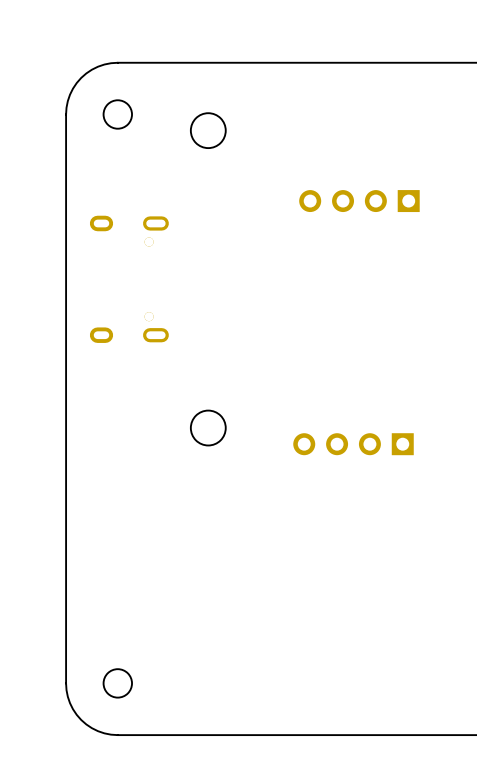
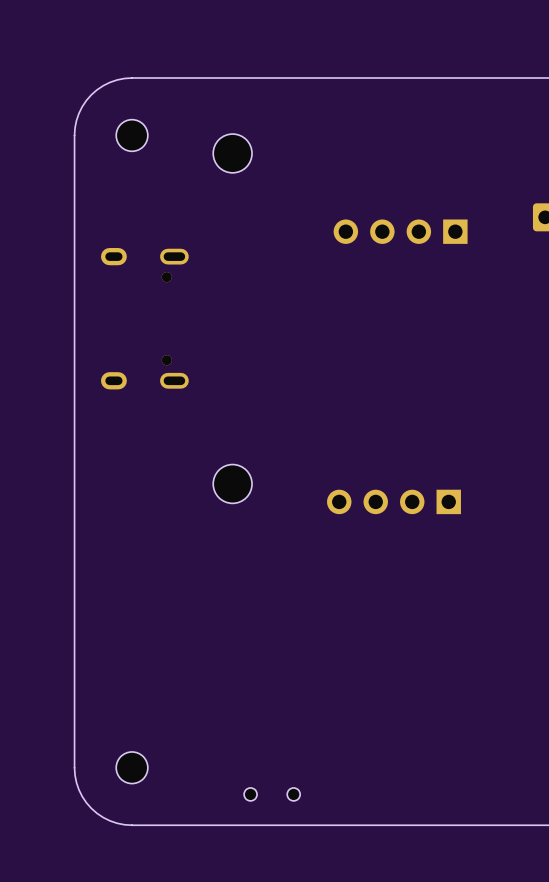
part: none -> (272, 794)

